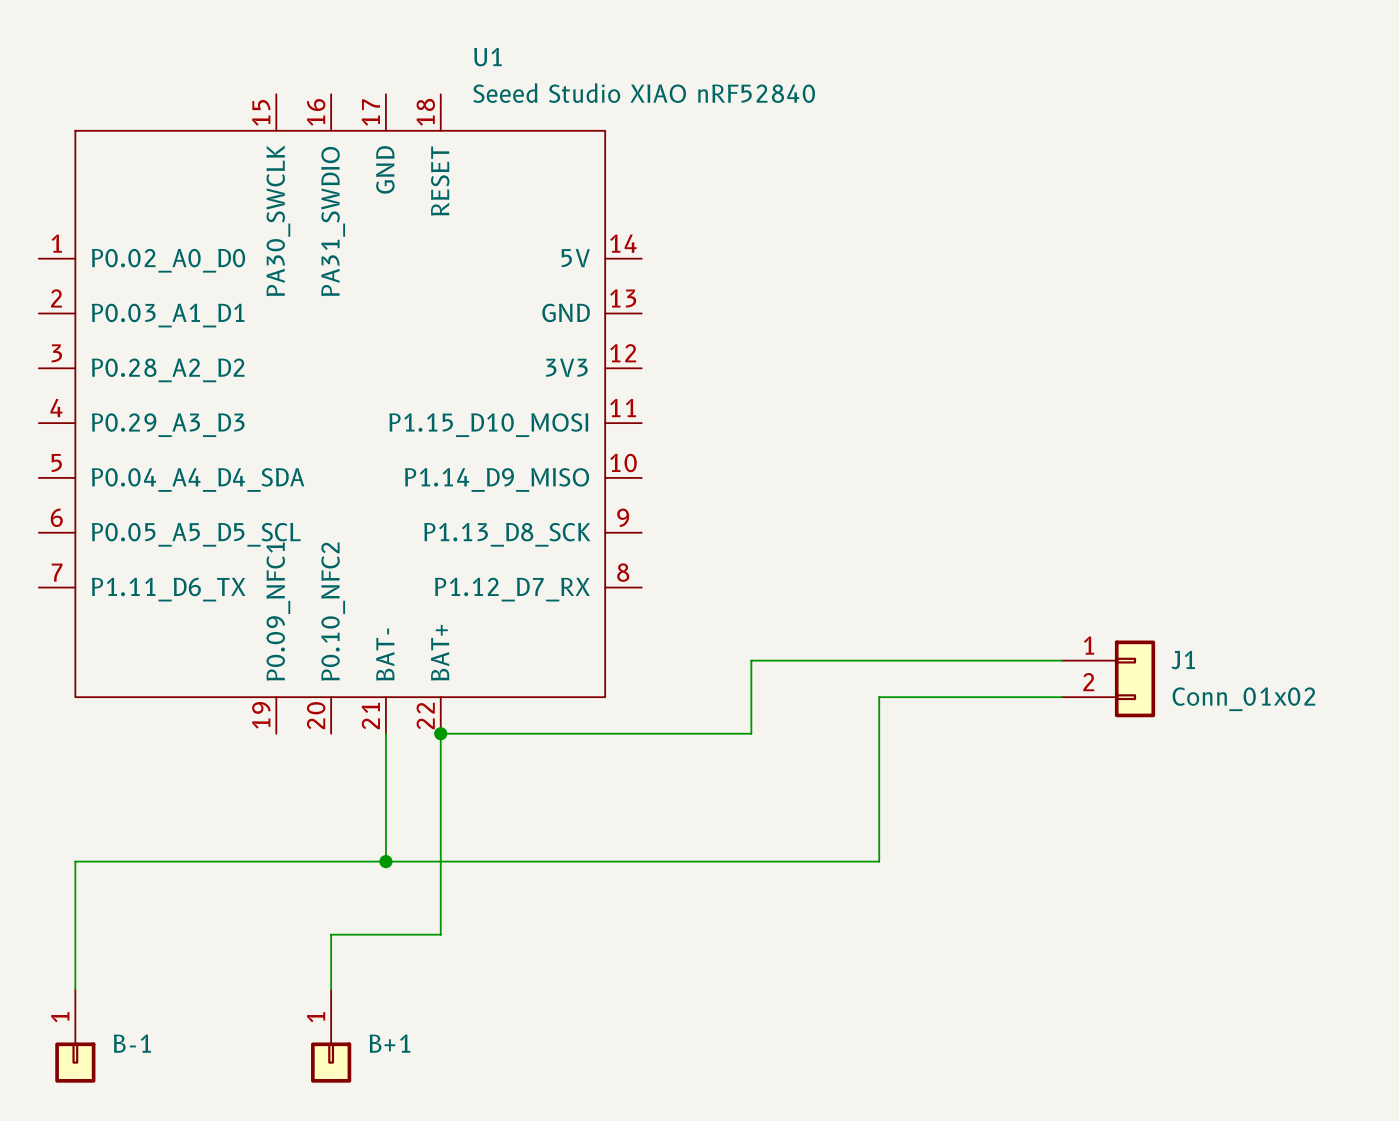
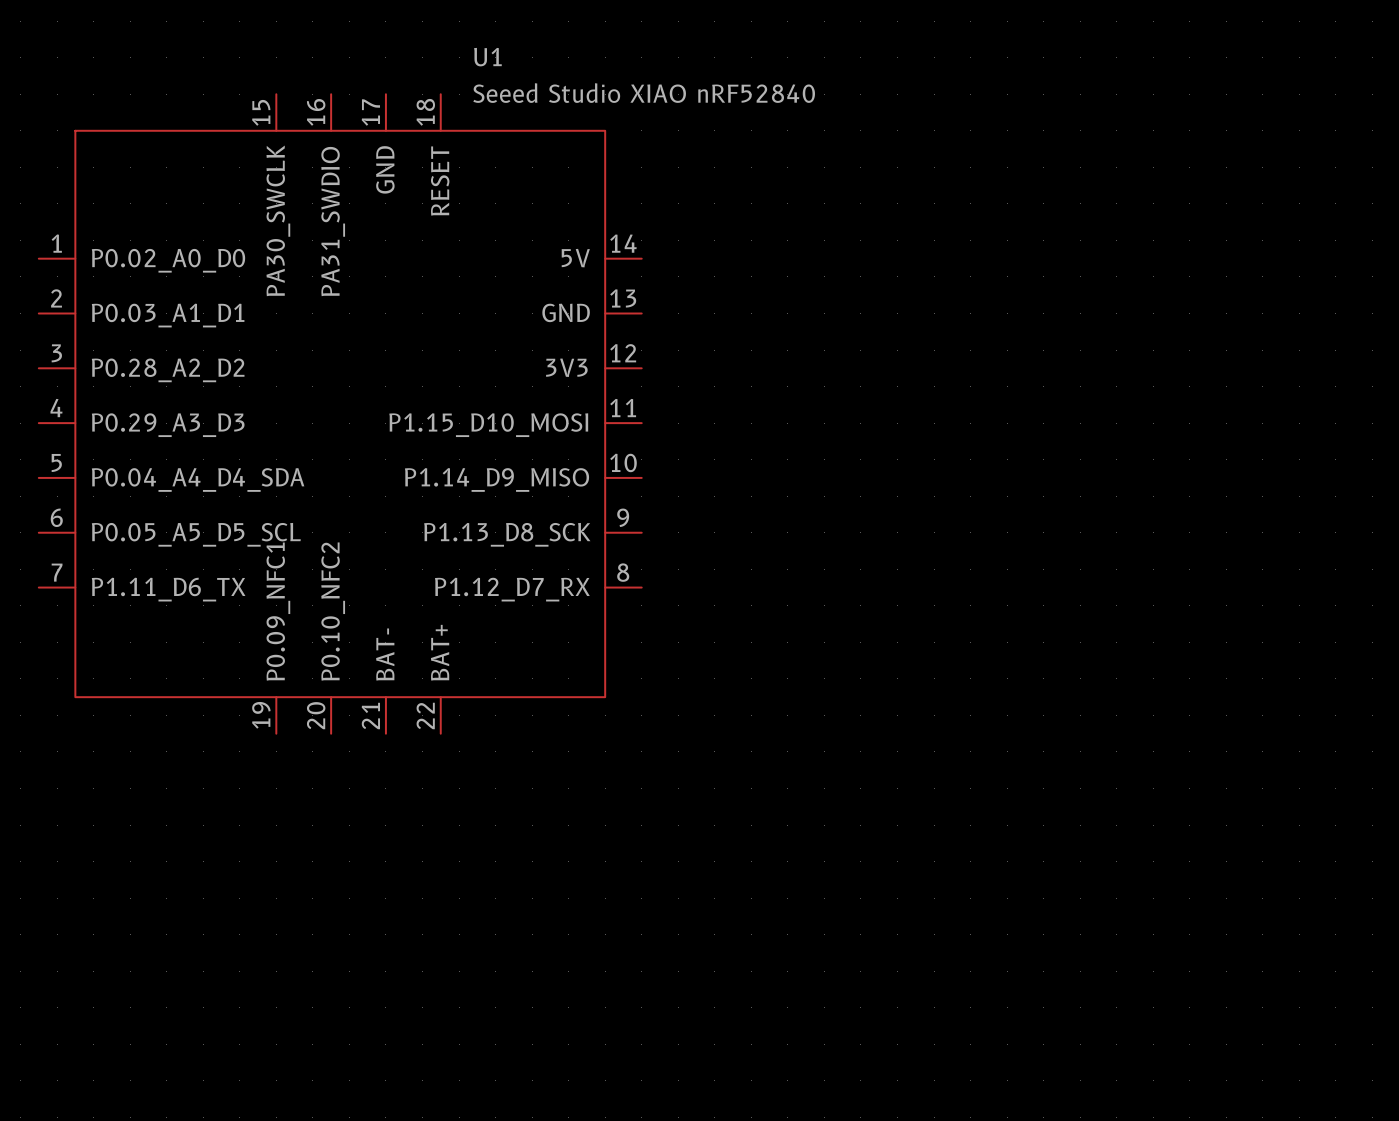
wire: (1061, 660) (751, 660) (751, 733) (440, 733) (440, 934) (331, 934) (331, 989) -> none
J1: Conn_01x02 (1108, 678) -> none
wire: (1061, 697) (879, 697) (879, 861) (75, 861) (75, 989) -> none
wire: (385, 733) (385, 861) -> none
junction: (440, 733) -> none
junction: (385, 861) -> none
B-1: (75, 1036) -> none
B+1: (331, 1036) -> none

